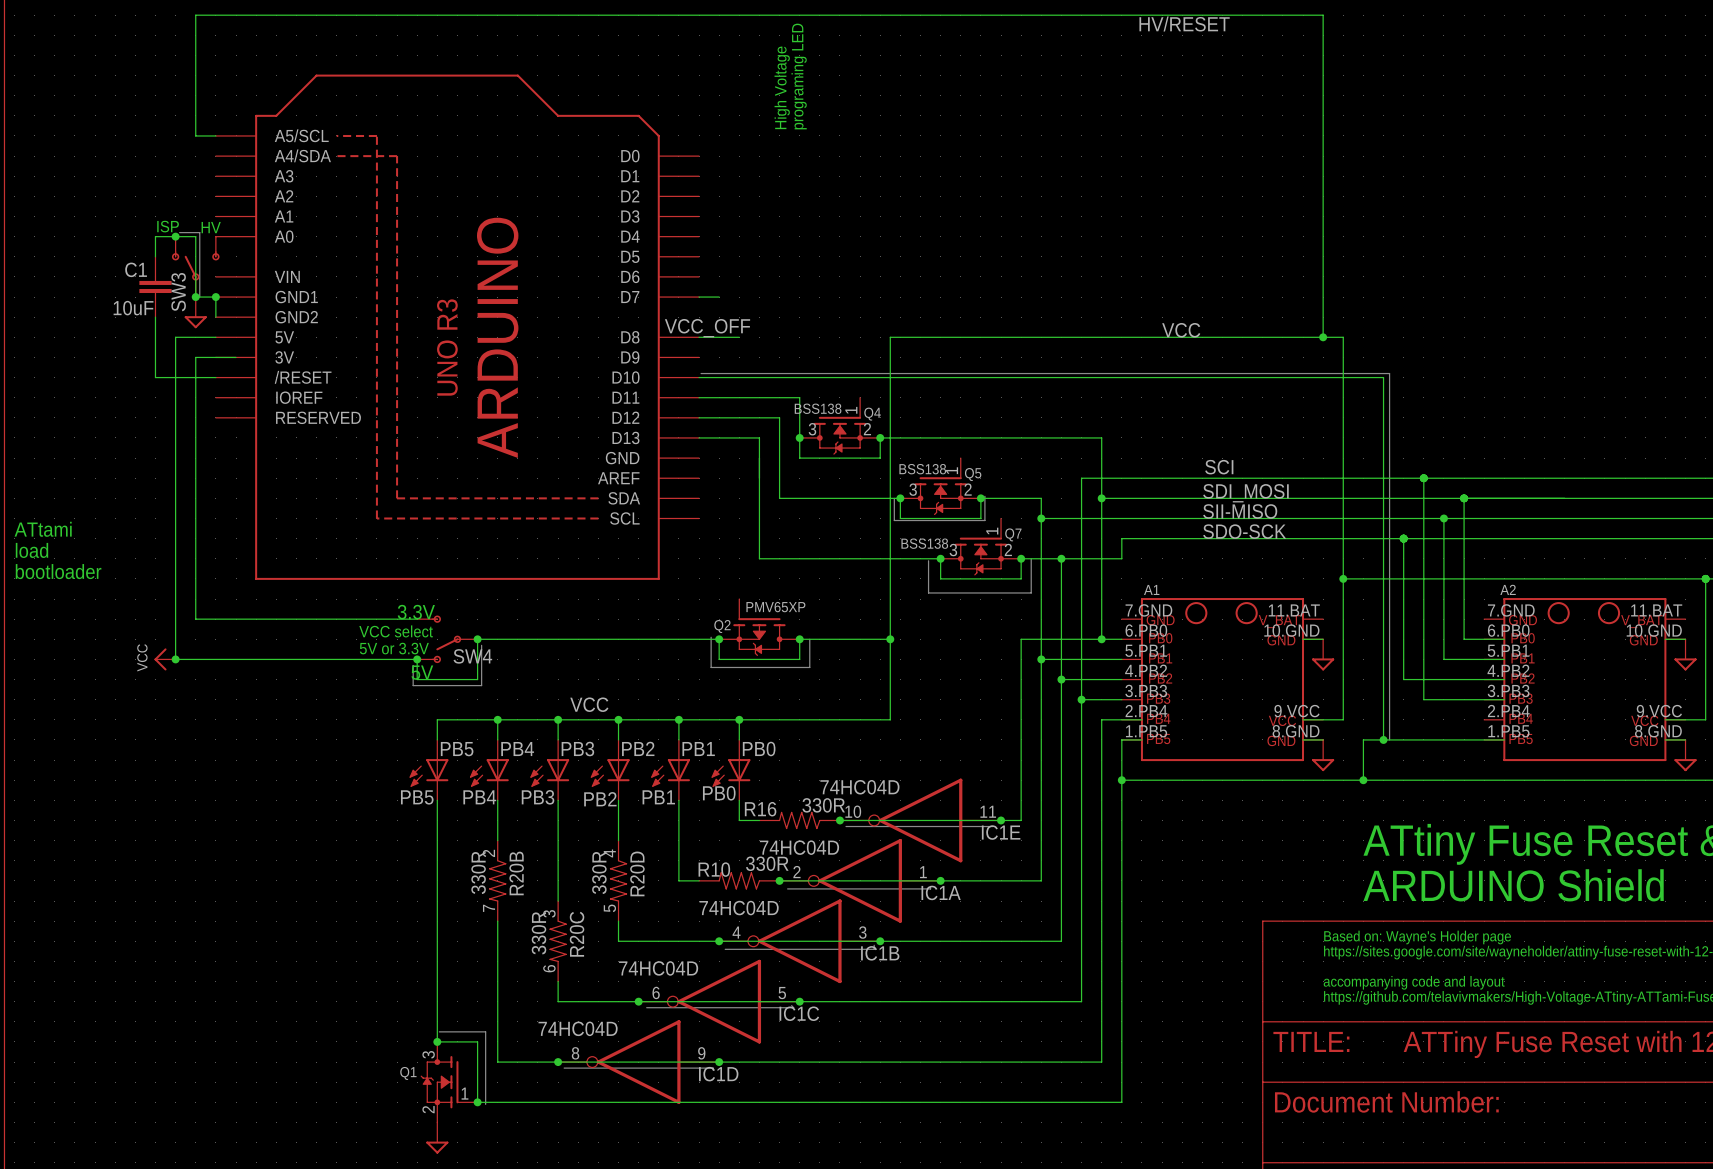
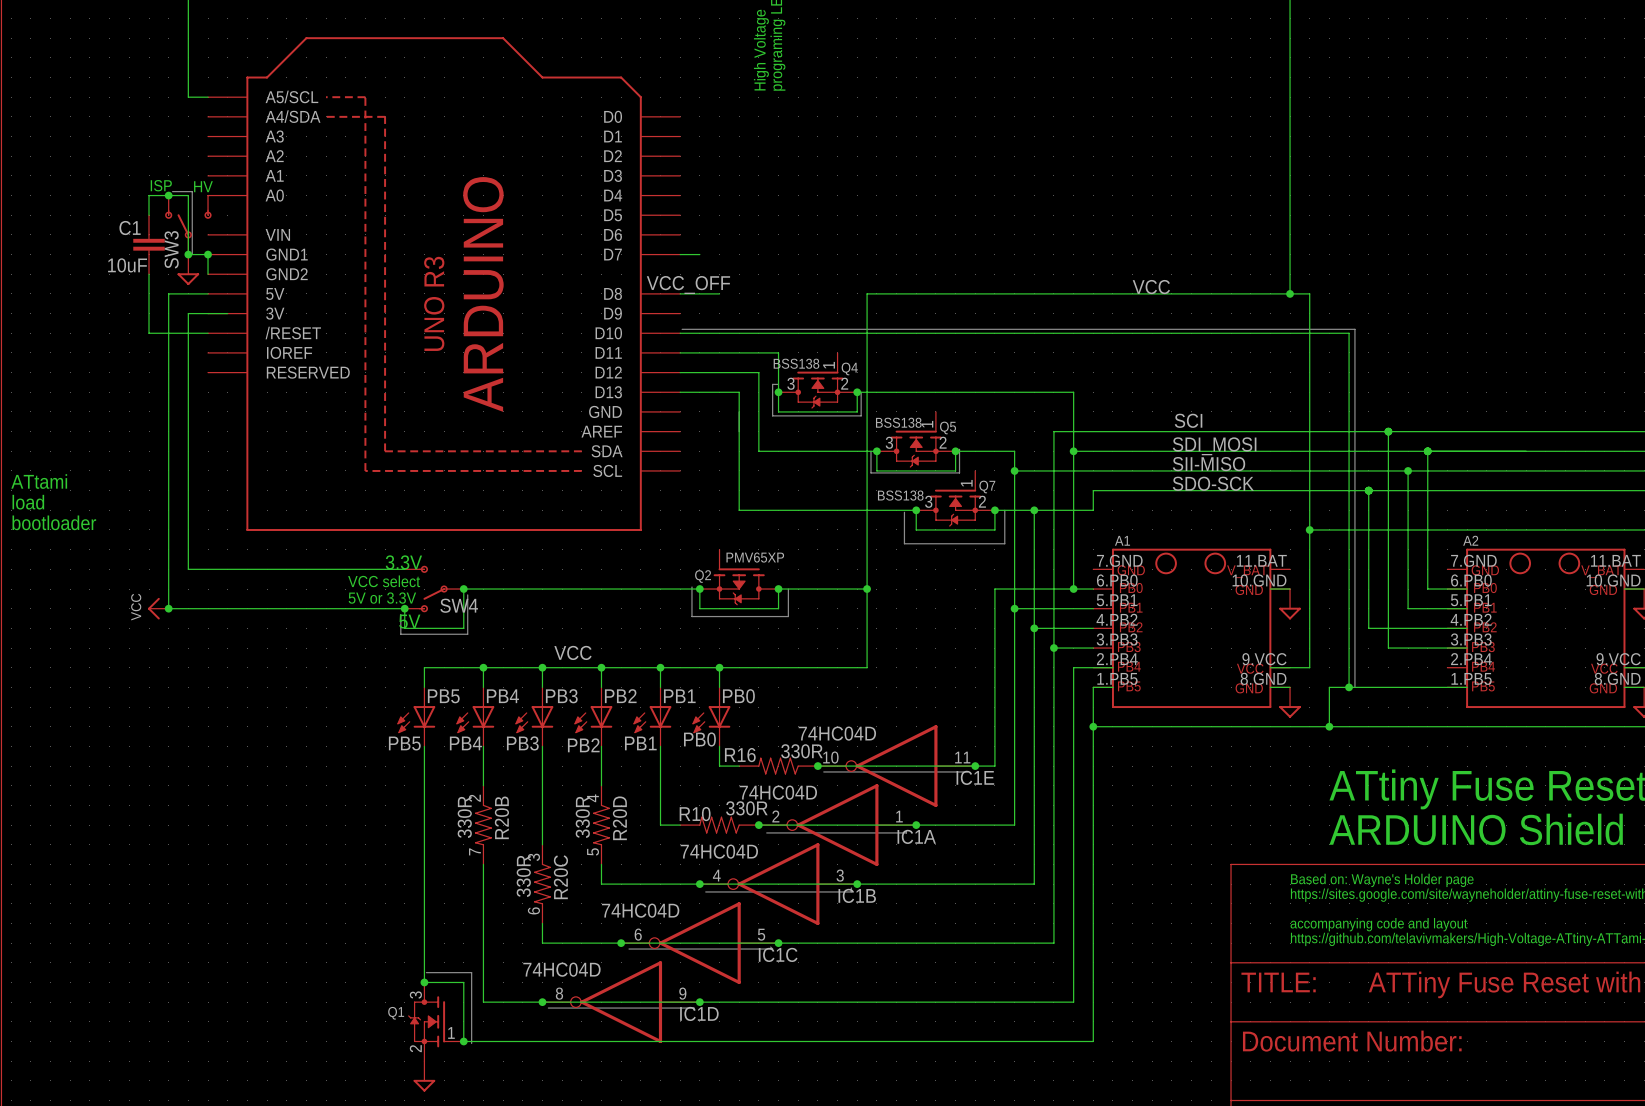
line: none -> (778, 384) (772, 384) (772, 415) (861, 415) (861, 392)

